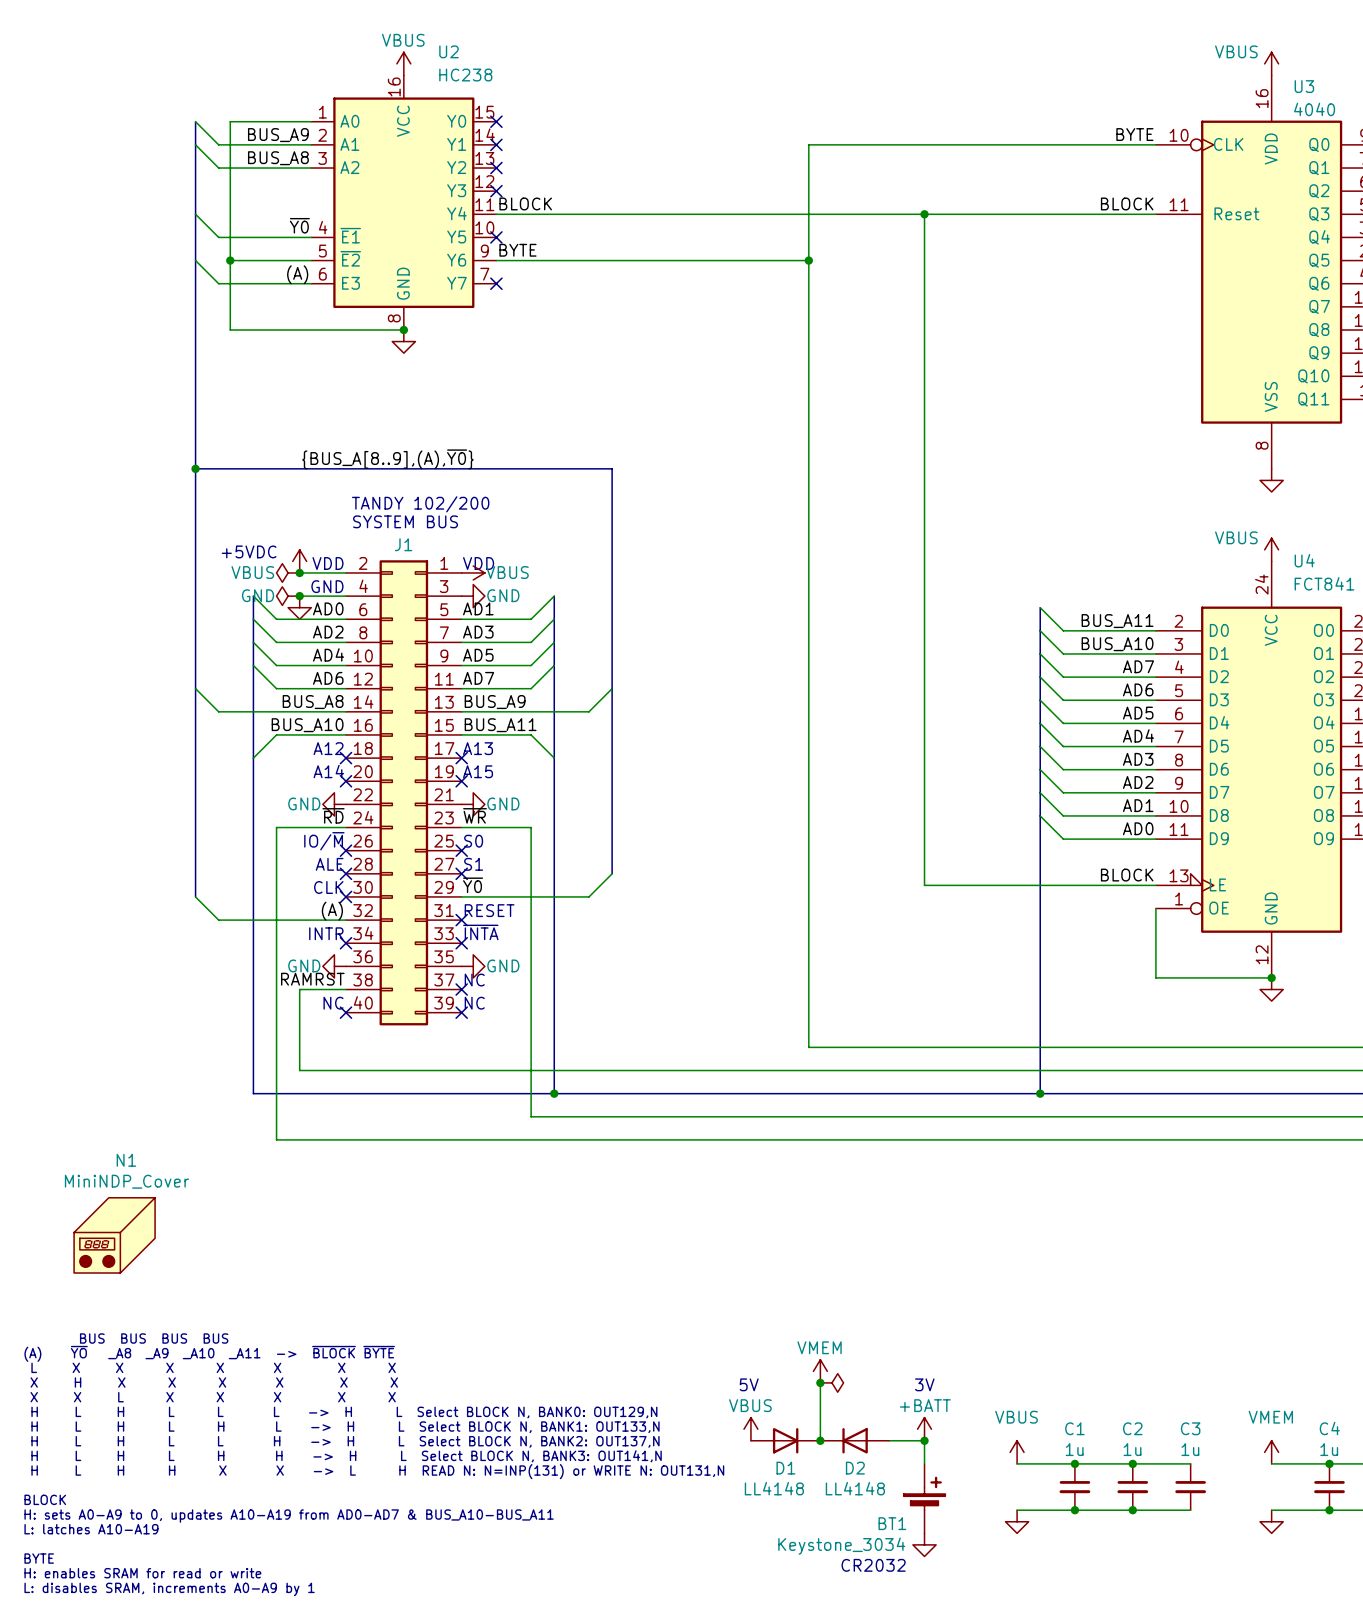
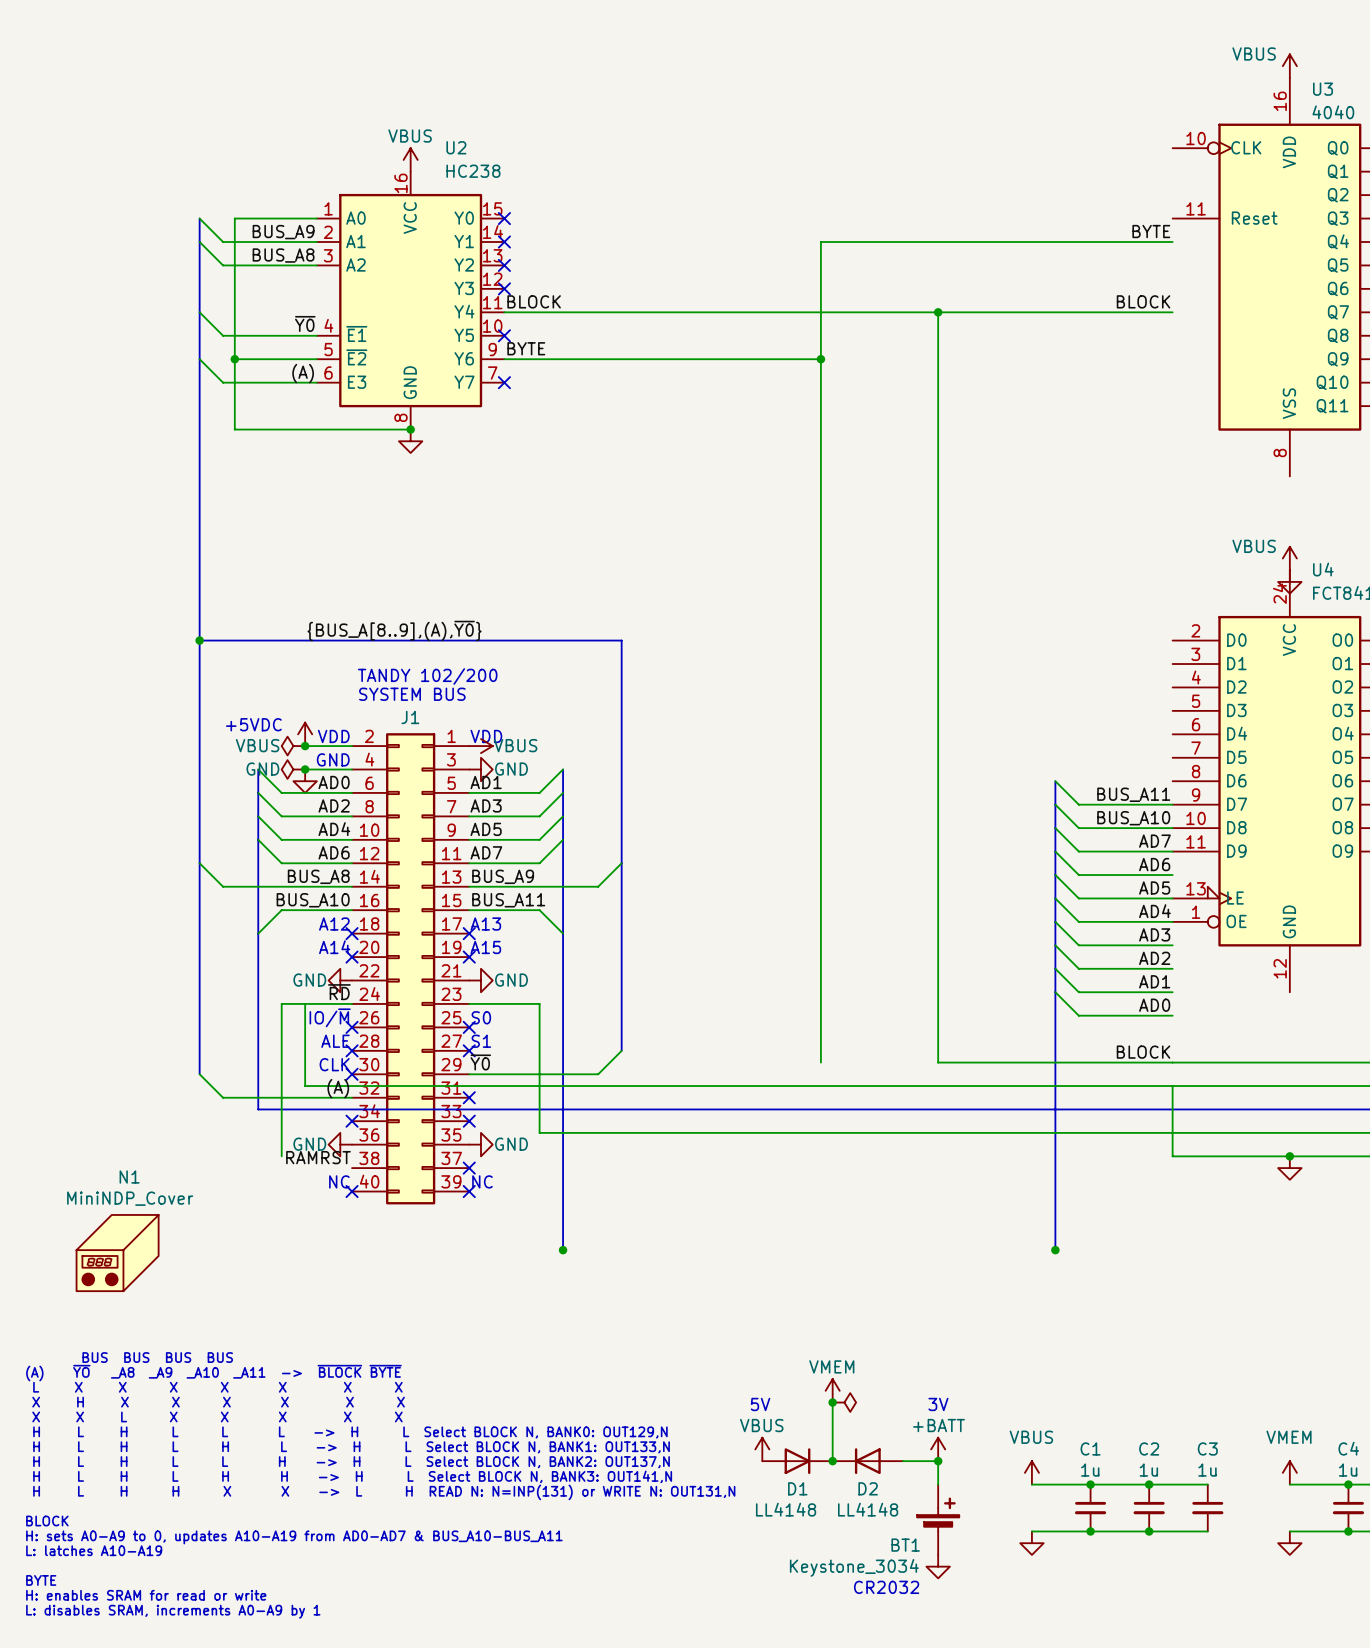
power symbol position: VBUS (403, 63) -> VBUS (410, 159)
wire: (195, 121) (218, 144) (311, 144) -> none
bus: (195, 121) (195, 214) -> none
wire: (311, 121) (230, 121) (230, 214) -> (316, 218) (234, 218)
no-connect mark: (496, 121) -> none
label position: BYTE (1134, 134) -> BYTE (1151, 231)
label: BUS_A9 (278, 135) -> none
wire: (195, 144) (218, 168) (311, 168) -> (199, 359) (223, 382) (316, 382)
no-connect mark: (496, 144) -> none
wire: (1155, 144) (808, 144) (808, 237) -> (1172, 241) (820, 241)
label position: BUS_A8 (278, 158) -> BUS_A8 (283, 255)
no-connect mark: (496, 168) -> none
no-connect mark: (496, 191) -> none
U2 position: (403, 202) -> (410, 300)
label position: BLOCK (525, 203) -> BLOCK (534, 301)
label position: BLOCK (1127, 203) -> BLOCK (1143, 301)
wire: (496, 214) (1155, 214) -> (504, 312) (1172, 312)
no-connect mark: none -> (504, 218)
wire: (924, 214) (924, 306) -> none
junction: (924, 214) -> none
label: ~{Y0} (299, 225) -> BUS_A9 (283, 232)
wire: none -> (199, 241) (223, 265) (234, 265)
label position: BYTE (517, 250) -> BYTE (526, 348)
wire: (195, 260) (218, 283) (311, 283) -> none
junction: (230, 260) -> none
wire: (496, 260) (808, 260) -> (504, 359) (820, 359)
no-connect mark: none -> (504, 265)
junction: (808, 260) -> none
label position: (A) (297, 274) -> (A) (303, 373)
wire: none -> (199, 312) (223, 335) (234, 335) (234, 429) (410, 429)
junction: none -> (938, 312)
label: none -> ~{Y0} (305, 323)
junction: (403, 330) -> none
no-connect mark: none -> (504, 335)
power symbol position: (403, 341) -> (410, 441)
wire: none -> (234, 359) (316, 359)
junction: none -> (234, 359)
junction: none -> (820, 359)
no-connect mark: none -> (504, 382)
junction: none -> (410, 429)
label position: {BUS_A[8..9],(A),~{Y0}} (387, 459) -> {BUS_A[8..9],(A),~{Y0}} (394, 630)
bus: (195, 468) (612, 468) (612, 630) -> (199, 640) (621, 640)
junction: (195, 468) -> none
power symbol position: (1271, 480) -> (1289, 581)
text position: TANDY 102/200 (420, 504) -> TANDY 102/200 (427, 676)
text position: SYSTEM BUS (405, 521) -> SYSTEM BUS (412, 694)
text position: +5VDC (249, 551) -> +5VDC (253, 724)
power symbol: VBUS (299, 561) -> none
text: VDD (327, 563) -> none
text: VDD (478, 563) -> none
power symbol: (288, 572) -> none
wire: (299, 572) (345, 572) -> none
junction: (299, 572) -> none
power symbol: VBUS (473, 572) -> none
text: GND (327, 586) -> none
wire: (253, 596) (276, 619) (345, 619) -> none
bus: (253, 596) (253, 758) -> none
power symbol: (288, 596) -> none
wire: (299, 596) (345, 596) -> (305, 769) (352, 769)
junction: (299, 596) -> none
power symbol: GND (473, 596) -> none
wire: (554, 596) (531, 619) (461, 619) -> none
bus: (554, 596) (554, 758) -> none
power symbol: GND (299, 607) -> none
wire: (1040, 607) (1063, 630) (1155, 630) -> none
bus: (1040, 607) (1040, 769) -> none
label position: AD0 (328, 608) -> AD0 (334, 782)
label position: AD1 (478, 608) -> AD1 (486, 782)
wire: (253, 619) (276, 642) (345, 642) -> (258, 792) (281, 816) (352, 816)
wire: (554, 619) (531, 642) (461, 642) -> (563, 792) (539, 816) (469, 816)
label: BUS_A11 (1117, 621) -> none
junction: none -> (199, 640)
wire: (1040, 630) (1063, 653) (1155, 653) -> none
label position: AD2 (328, 632) -> AD2 (334, 805)
label position: AD3 (478, 632) -> AD3 (486, 805)
wire: (253, 642) (276, 665) (345, 665) -> none
wire: (554, 642) (531, 665) (461, 665) -> none
label: BUS_A10 (1117, 644) -> none
wire: (1040, 653) (1063, 677) (1155, 677) -> none
label: AD4 (328, 654) -> none
label: AD5 (478, 655) -> none
wire: (253, 665) (276, 688) (345, 688) -> (258, 839) (281, 863) (352, 863)
wire: (554, 665) (531, 688) (461, 688) -> (563, 839) (539, 863) (469, 863)
label: AD7 (1138, 666) -> none
wire: (1040, 677) (1063, 700) (1155, 700) -> (1055, 851) (1078, 875) (1172, 875)
label position: AD6 (328, 678) -> AD6 (334, 852)
label position: AD7 (478, 678) -> AD7 (486, 852)
wire: (195, 688) (218, 711) (345, 711) -> (199, 863) (223, 886) (352, 886)
wire: (612, 688) (588, 711) (461, 711) -> (621, 863) (598, 886) (469, 886)
label position: AD6 (1138, 689) -> AD6 (1154, 864)
wire: (1040, 700) (1063, 723) (1155, 723) -> none
label position: BUS_A8 (313, 702) -> BUS_A8 (318, 876)
label position: BUS_A9 (495, 702) -> BUS_A9 (503, 876)
label: AD5 (1138, 713) -> none
power symbol: none -> VBUS (305, 734)
wire: (1040, 723) (1063, 746) (1155, 746) -> (1055, 945) (1078, 968) (1172, 968)
label position: BUS_A10 (307, 725) -> BUS_A10 (313, 900)
text: none -> VDD (333, 736)
text: none -> VDD (486, 736)
label: BUS_A11 (500, 725) -> none
power symbol: none -> (293, 746)
wire: (299, 734) (276, 734) (253, 758) -> (352, 792) (281, 792) (258, 769)
junction: none -> (305, 746)
wire: (461, 734) (531, 734) (554, 758) -> (469, 792) (539, 792) (563, 769)
power symbol: none -> VBUS (480, 746)
label position: AD4 (1138, 735) -> AD4 (1154, 911)
wire: (1040, 746) (1063, 769) (1155, 769) -> (1055, 921) (1078, 945) (1172, 945)
text: A12 (328, 748) -> GND (333, 759)
text: A13 (478, 748) -> none
power symbol: none -> (293, 769)
junction: none -> (305, 769)
no-connect mark: (345, 758) -> none
no-connect mark: (461, 758) -> none
label position: AD3 (1138, 759) -> AD3 (1154, 934)
text: A14 (328, 771) -> none
text: A15 (478, 771) -> none
no-connect mark: (345, 781) -> none
no-connect mark: (461, 781) -> none
label: AD2 (1138, 782) -> BUS_A11 (1133, 794)
J1 position: (403, 792) -> (410, 968)
wire: none -> (258, 816) (281, 839)
power symbol rotation: 0° (334, 804) -> 90° counterclockwise (305, 781)
power symbol position: GND (334, 804) -> GND (305, 781)
power symbol position: GND (473, 804) -> GND (480, 769)
wire: none -> (563, 816) (539, 839)
label: AD1 (1138, 805) -> BUS_A10 (1133, 818)
label: ~{RD} (333, 815) -> AD4 (334, 829)
label: ~{WR} (475, 815) -> AD5 (486, 829)
wire: (276, 827) (276, 989) -> (305, 1003) (281, 1003)
wire: (531, 827) (531, 989) -> (469, 1003) (539, 1003)
label: AD0 (1138, 828) -> AD7 (1154, 841)
text: IO/~{M} (324, 841) -> none
text: S0 (473, 841) -> none
no-connect mark: (345, 850) -> none
no-connect mark: (461, 850) -> none
text position: ALE (329, 864) -> ALE (335, 1041)
text position: S1 (473, 864) -> S1 (481, 1041)
no-connect mark: (345, 873) -> none
no-connect mark: (461, 873) -> none
wire: (612, 873) (588, 896) (531, 896) -> (563, 933) (539, 910)
bus: none -> (621, 886) (621, 1050)
label: BLOCK (1127, 875) -> AD5 (1154, 887)
label: ~{Y0} (473, 885) -> BUS_A11 (508, 900)
wire: (924, 885) (1063, 885) -> (1055, 875) (1078, 898)
text position: CLK (328, 887) -> CLK (334, 1064)
wire: (195, 896) (218, 920) (345, 920) -> (199, 1074) (223, 1097) (352, 1097)
bus: none -> (199, 910) (199, 1074)
wire: none -> (352, 910) (281, 910) (258, 933)
no-connect mark: (345, 896) -> none
wire: (1155, 908) (1155, 977) (1271, 977) -> (1172, 921) (1078, 921) (1055, 898)
text: none -> A12 (334, 924)
text: RESET (489, 910) -> A13 (485, 924)
label position: (A) (332, 911) -> (A) (338, 1088)
no-connect mark: none -> (352, 933)
text: ~{INTA} (480, 932) -> A15 (485, 947)
text: INTR (326, 933) -> A14 (334, 947)
label: none -> AD2 (1154, 958)
wire: none -> (1055, 968) (1078, 992) (1172, 992)
label: none -> AD1 (1154, 981)
wire: none -> (1055, 992) (1078, 1015) (1172, 1015)
junction: (1271, 977) -> none
label: RAMRST (312, 979) -> ~{RD} (339, 992)
text: NC (474, 980) -> none
no-connect mark: (461, 989) -> none
power symbol position: (1271, 989) -> (1289, 1168)
label: none -> AD0 (1154, 1005)
text: NC (333, 1003) -> IO/~{M} (330, 1017)
text: NC (474, 1003) -> S0 (481, 1017)
no-connect mark: none -> (352, 1050)
no-connect mark: none -> (469, 1050)
wire: none -> (621, 1050) (598, 1074) (469, 1074)
label: none -> BLOCK (1143, 1052)
label: none -> ~{Y0} (480, 1062)
wire: (808, 1047) (924, 1047) -> (938, 898) (938, 1062)
no-connect mark: none -> (352, 1074)
no-connect mark: none -> (469, 1097)
bus: none -> (563, 1109) (563, 1250)
junction: (554, 1093) -> none
bus: none -> (1055, 1109) (1055, 1250)
junction: (1040, 1093) -> none
no-connect mark: none -> (352, 1121)
no-connect mark: none -> (469, 1121)
power symbol: none -> GND (340, 1144)
power symbol: none -> GND (480, 1144)
wire: (276, 1139) (1155, 1139) -> (1172, 1086) (1172, 1156)
junction: none -> (1289, 1156)
label: none -> RAMRST (318, 1157)
no-connect mark: none -> (469, 1168)
text: none -> NC (339, 1181)
text: none -> NC (482, 1181)
no-connect mark: none -> (352, 1191)
no-connect mark: none -> (469, 1191)
junction: none -> (563, 1250)
junction: none -> (1055, 1250)

